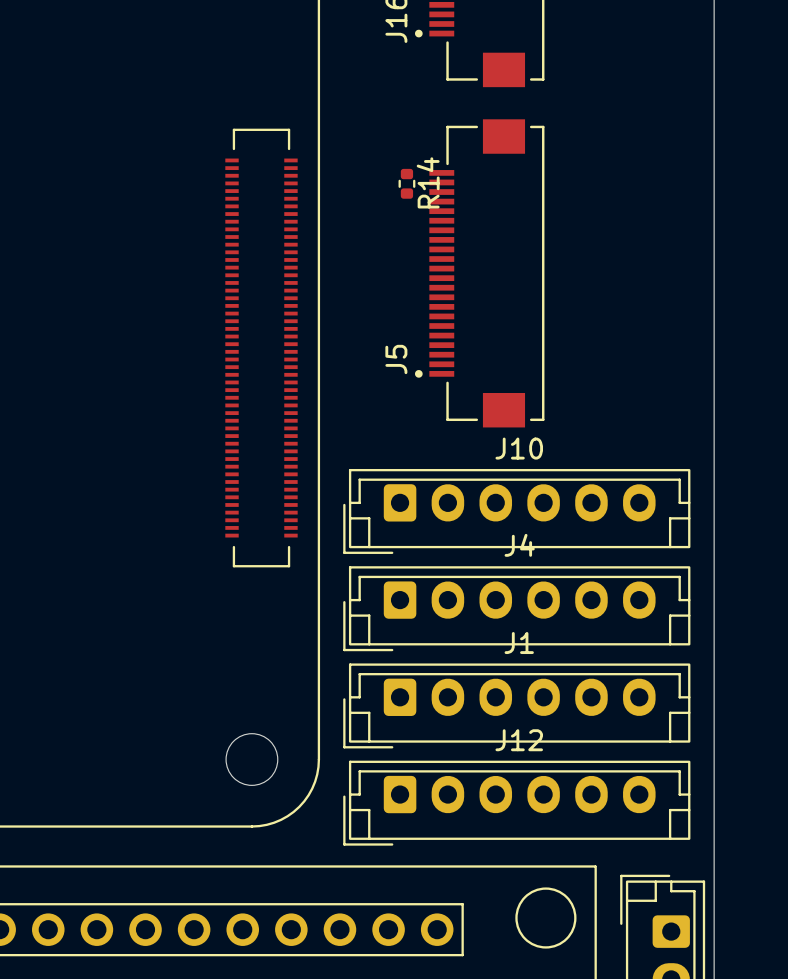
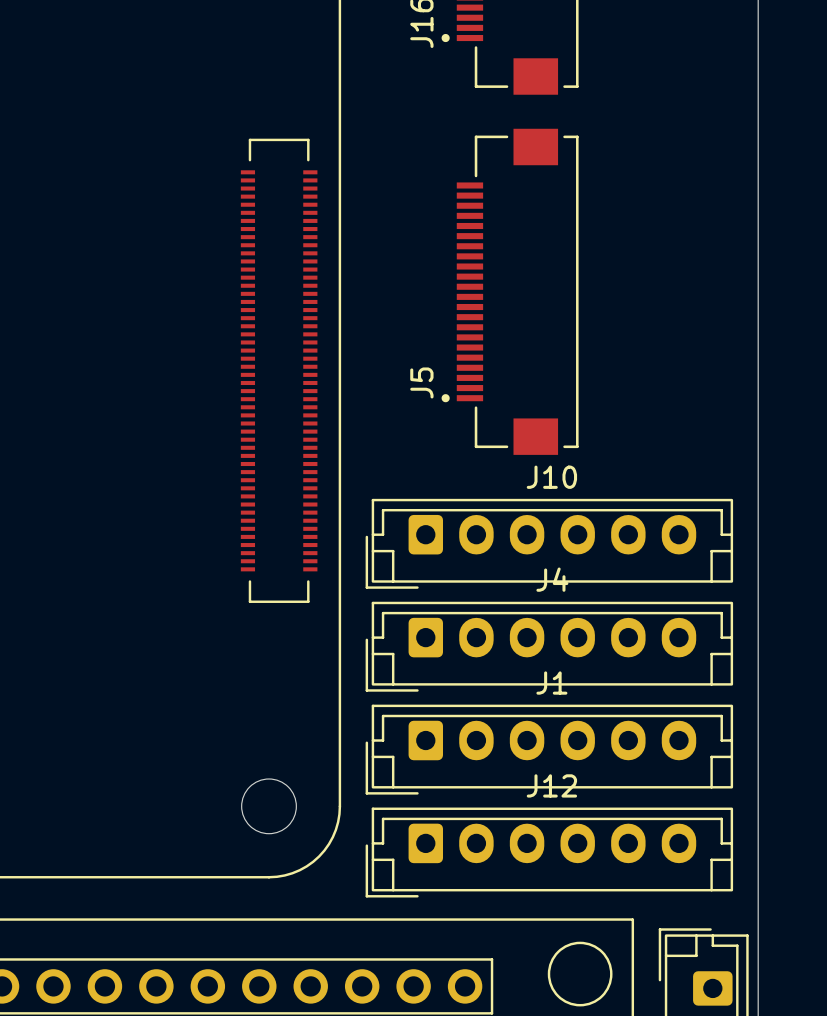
R14: (406, 183) -> none

